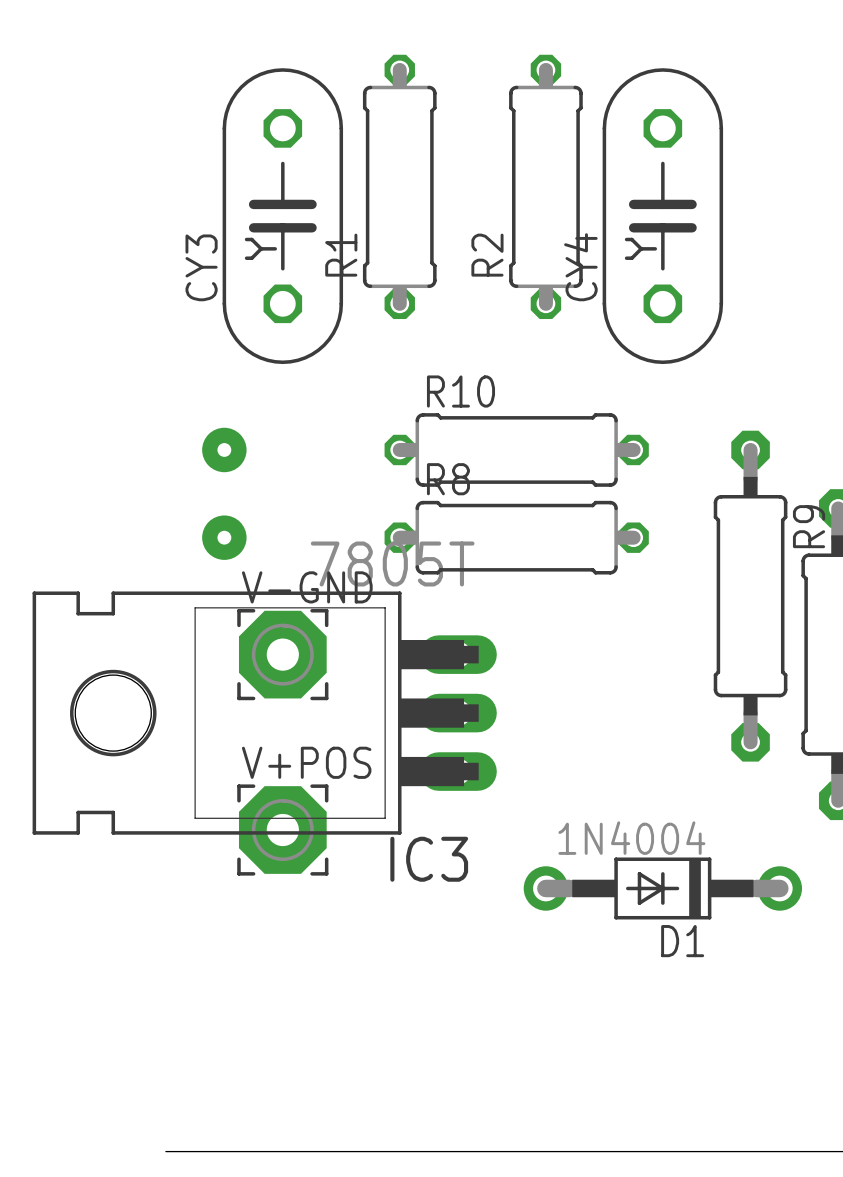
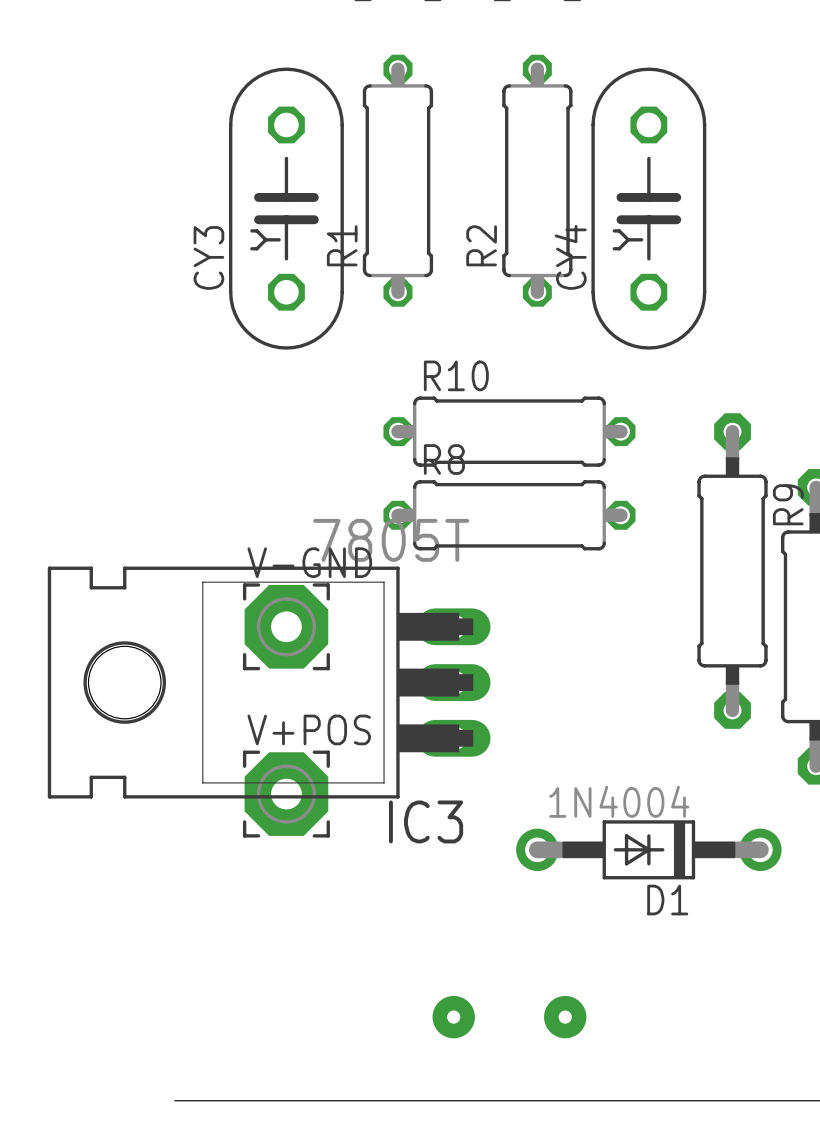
via: (224, 449) -> none
via: (224, 537) -> none
via: none -> (453, 1017)
via: none -> (565, 1017)

